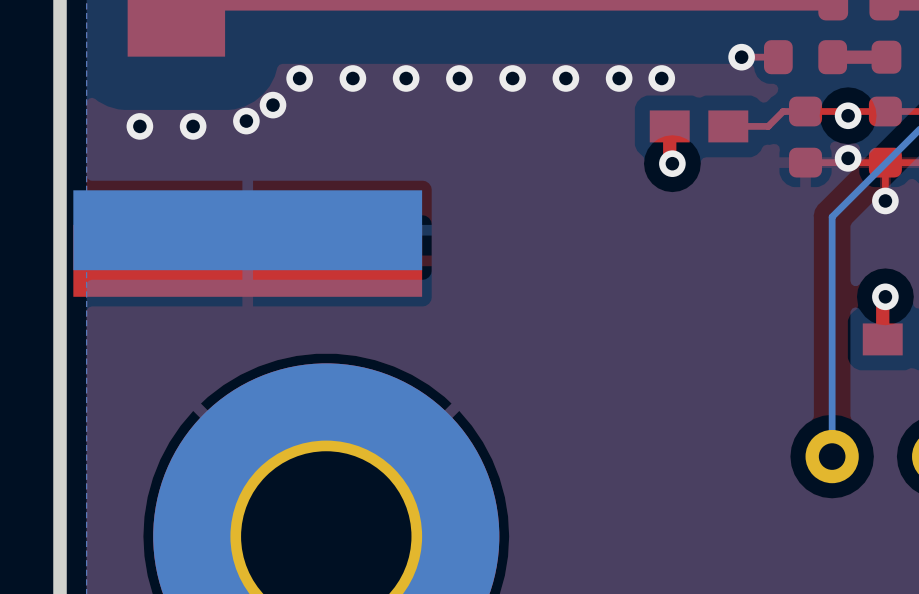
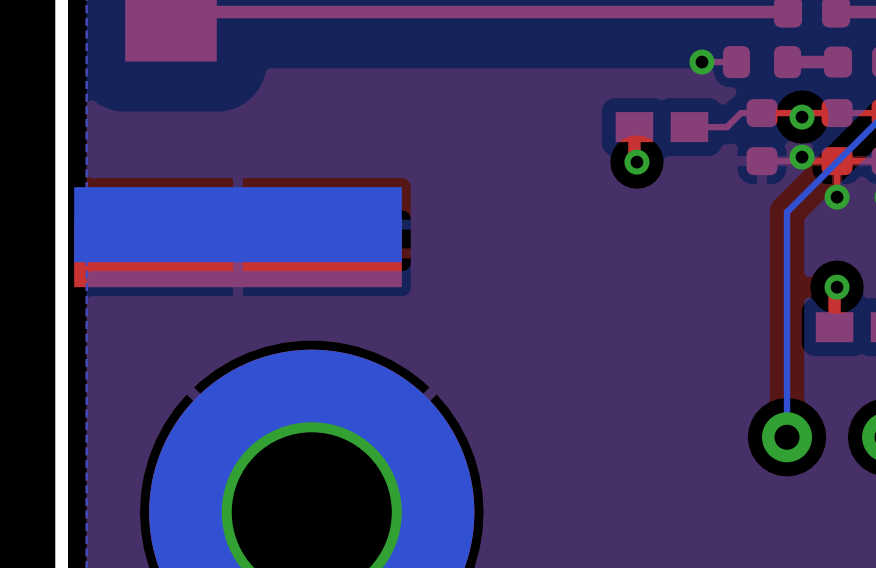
via: (299, 78) -> none
via: (352, 78) -> none
via: (406, 78) -> none
via: (459, 78) -> none
via: (512, 78) -> none
via: (565, 78) -> none
via: (619, 78) -> none
via: (661, 78) -> none
via: (273, 105) -> none
via: (246, 121) -> none
via: (139, 126) -> none
via: (193, 126) -> none

